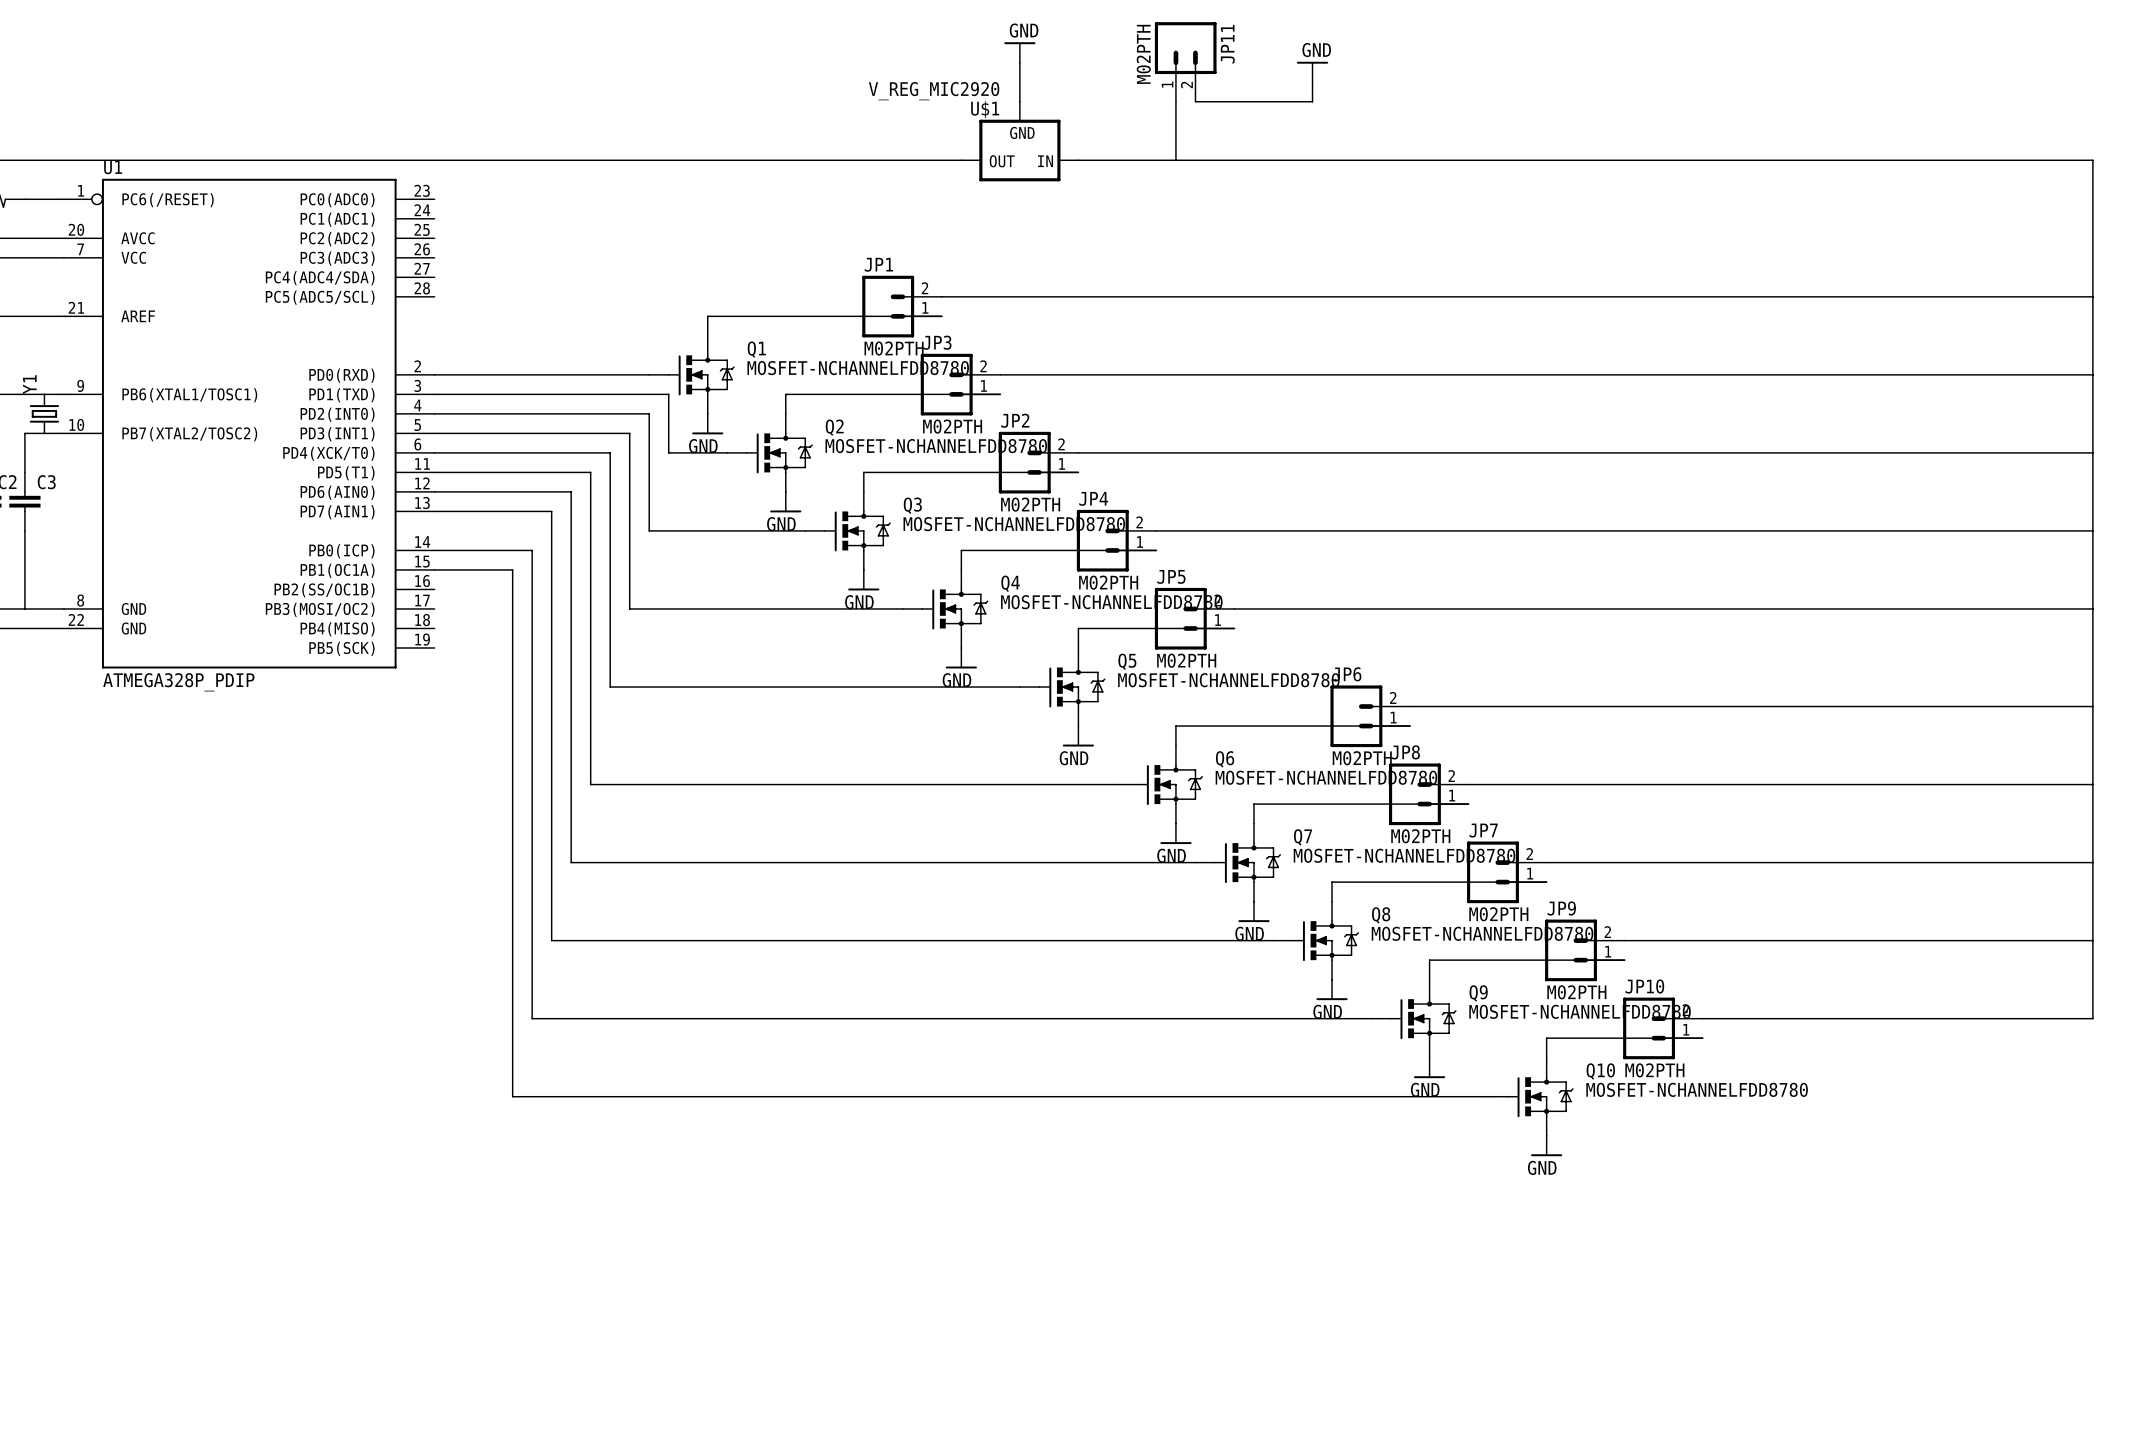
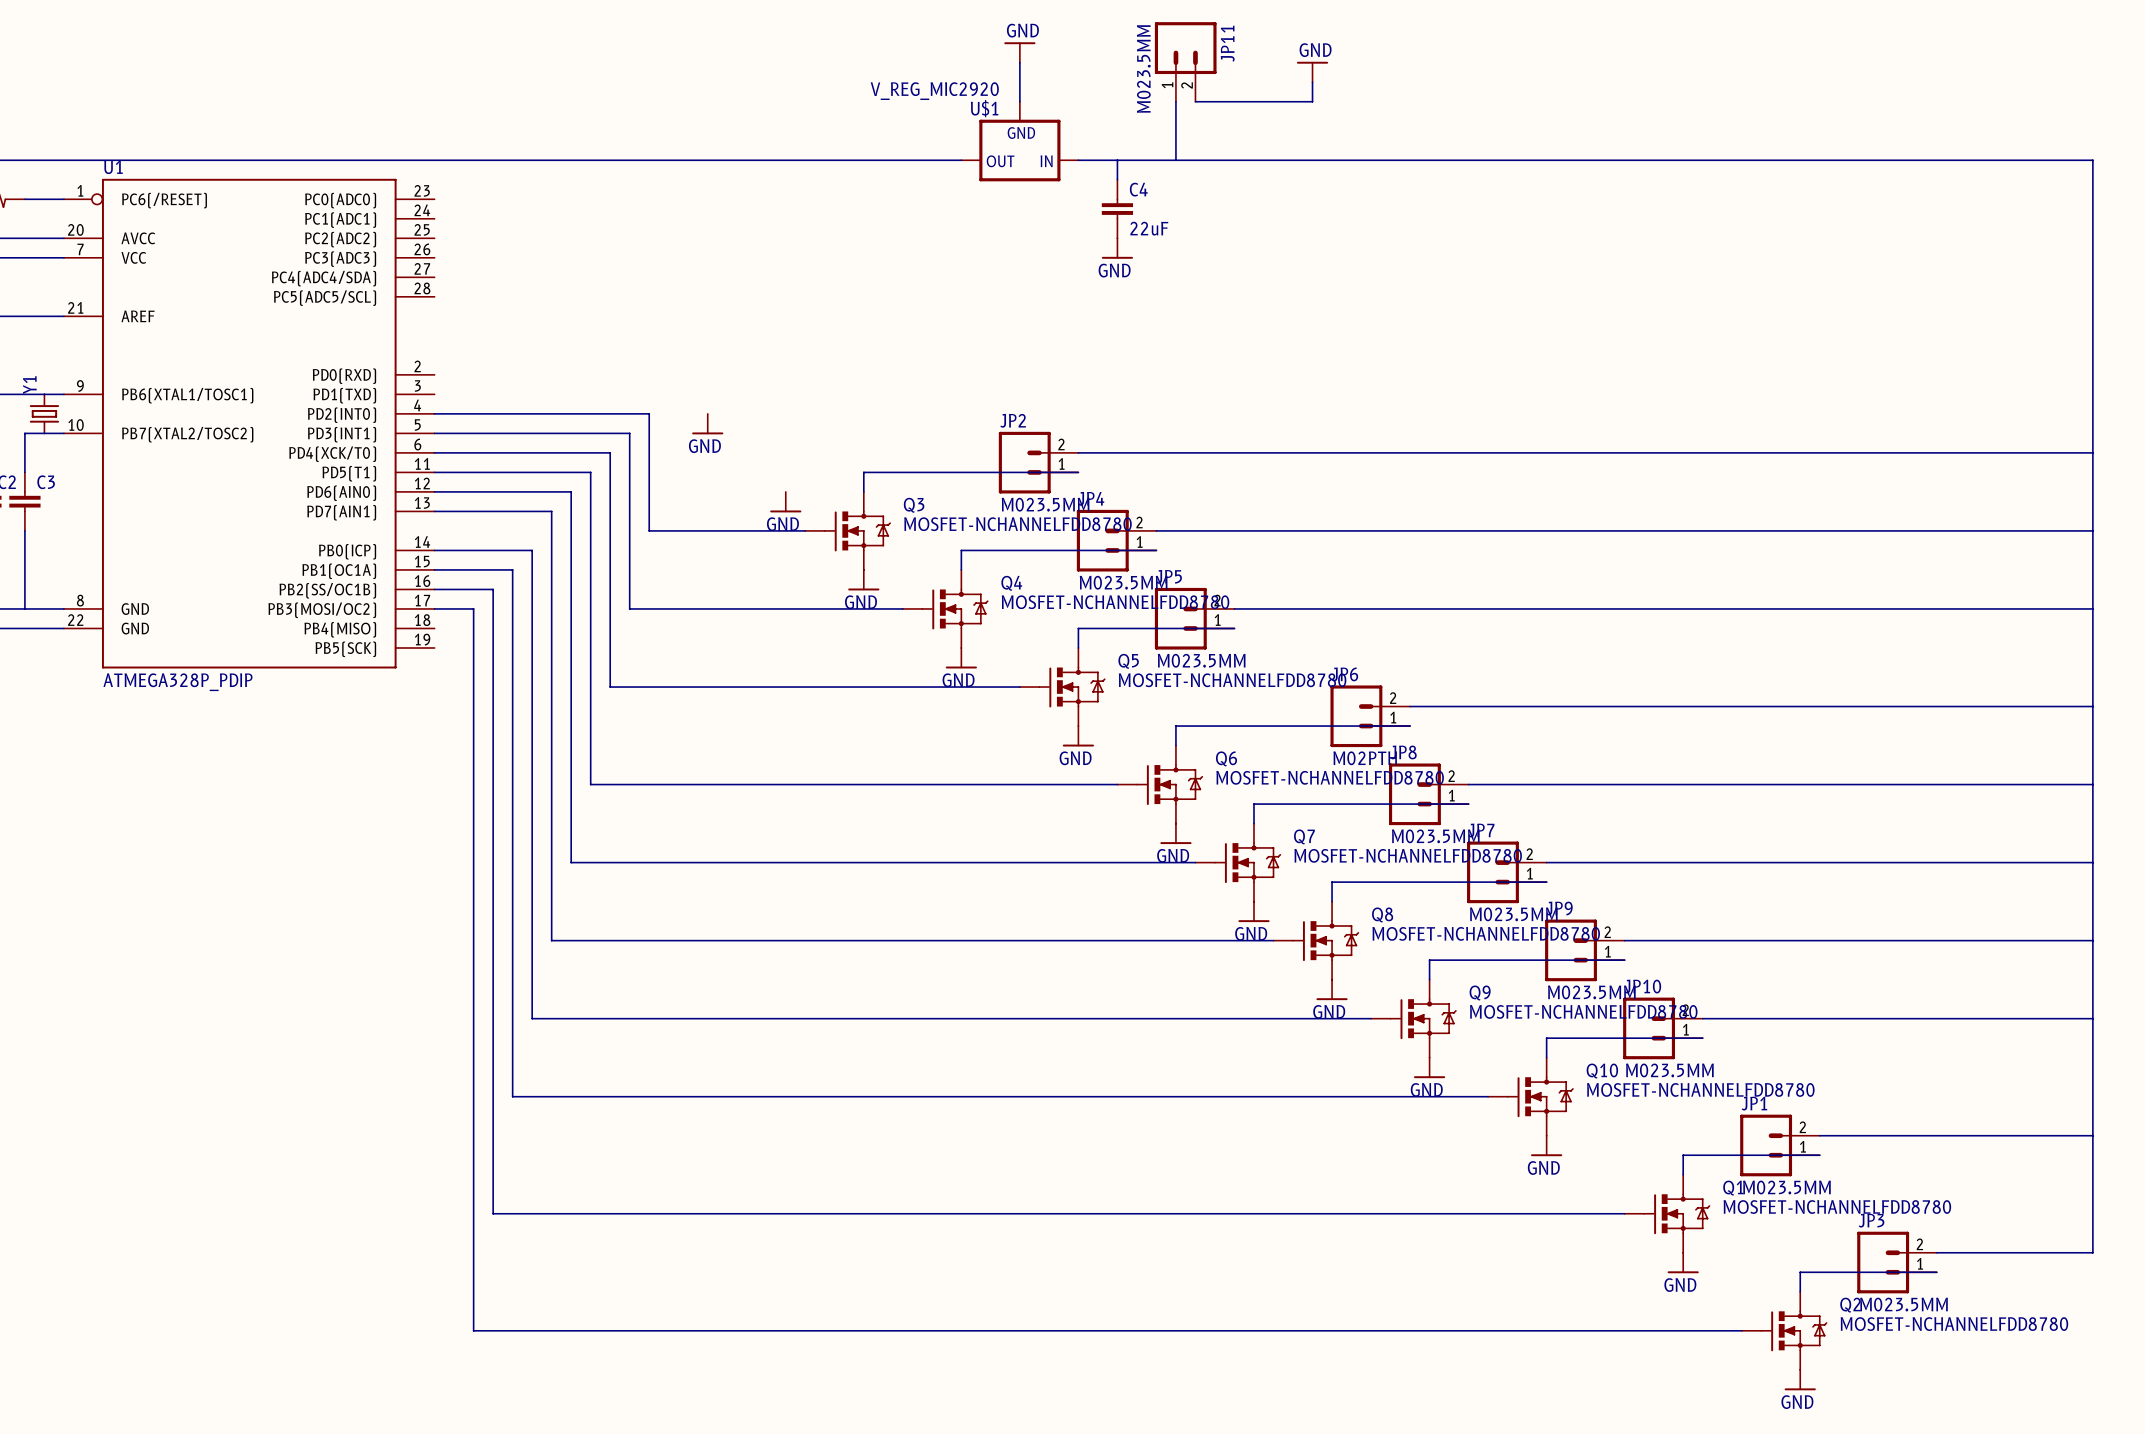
JP11 value: M02PTH (1143, 54) -> M023.5MM (1143, 69)
wire: none -> (1117, 160) (1117, 179)
C4: none -> 22uF (1117, 209)
power symbol: none -> GND (1117, 248)
wire: (941, 296) (2092, 296) -> none
JP1 position: (902, 306) -> (1779, 1145)
wire: (941, 316) (707, 316) (707, 335) -> none
JP1 value: M02PTH (894, 348) -> M023.5MM (1786, 1187)
wire: (434, 374) (649, 374) -> none
Q1 position: (691, 374) -> (1667, 1213)
wire: (1000, 374) (2092, 374) -> none
JP3 position: (960, 384) -> (1897, 1262)
wire: (434, 394) (668, 394) (668, 452) (727, 452) -> none
wire: (1000, 394) (785, 394) (785, 413) -> none
JP3 value: M02PTH (952, 426) -> M023.5MM (1903, 1304)
Q2 position: (769, 452) -> (1784, 1330)
JP2 value: M02PTH (1030, 504) -> M023.5MM (1045, 504)
JP4 value: M02PTH (1108, 582) -> M023.5MM (1123, 582)
wire: none -> (434, 589) (493, 589) (493, 1213) (1624, 1213)
wire: none -> (434, 608) (473, 608) (473, 1330) (1741, 1330)
JP5 value: M02PTH (1186, 660) -> M023.5MM (1201, 660)
JP8 value: M02PTH (1420, 836) -> M023.5MM (1435, 836)
JP7 value: M02PTH (1498, 914) -> M023.5MM (1513, 914)
JP9 value: M02PTH (1576, 992) -> M023.5MM (1591, 992)
wire: none -> (2092, 1018) (2092, 1252) (1936, 1252)
JP10 value: M02PTH (1654, 1070) -> M023.5MM (1669, 1070)
wire: none -> (1819, 1135) (2092, 1135)
wire: none -> (1819, 1155) (1683, 1155) (1683, 1174)
power symbol: none -> GND (1683, 1263)
wire: none -> (1936, 1272) (1800, 1272) (1800, 1291)
power symbol: none -> GND (1800, 1380)

